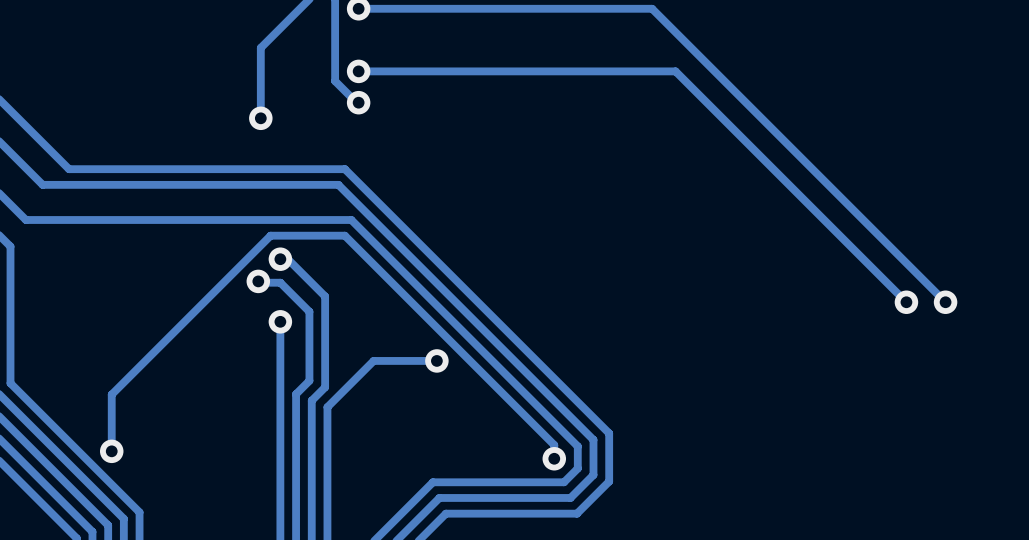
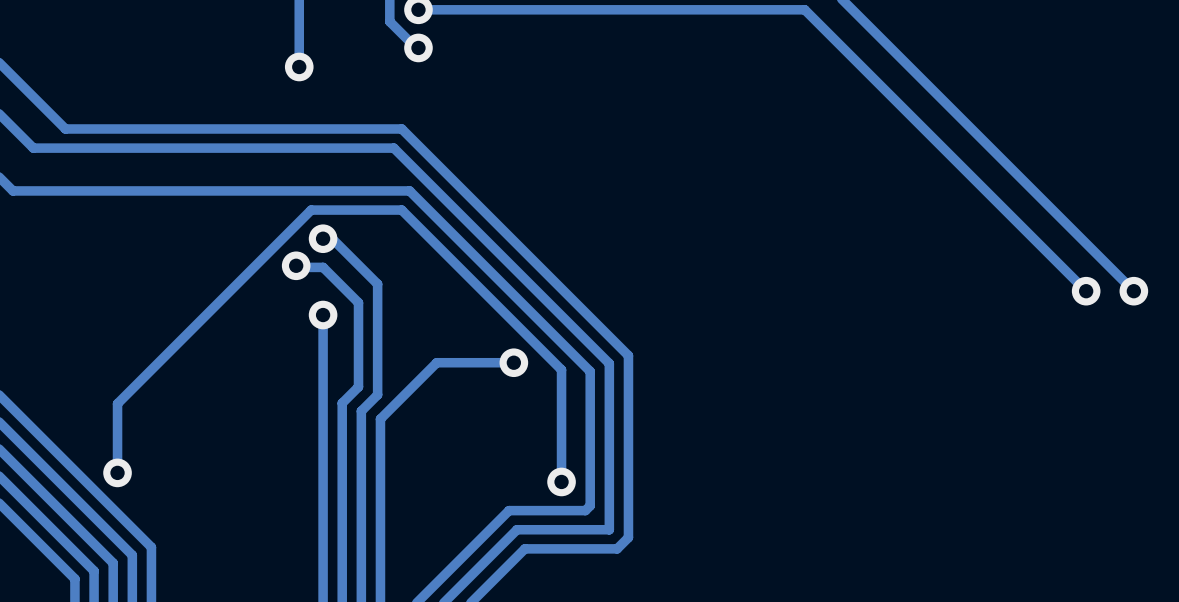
track: (530, 355) (609, 433) (609, 481) (577, 513) (521, 513) -> (628, 355) (628, 537) (617, 548)
track: (515, 361) (593, 439) (593, 475) (570, 497) (515, 497) -> (609, 363) (609, 529)
track: (476, 366) (554, 445) (554, 458) -> (561, 369) (561, 481)
track: (499, 368) (577, 446) (577, 468) (564, 482) (495, 482) -> (590, 371) (590, 505) (585, 510)
via position: (554, 458) -> (561, 481)

